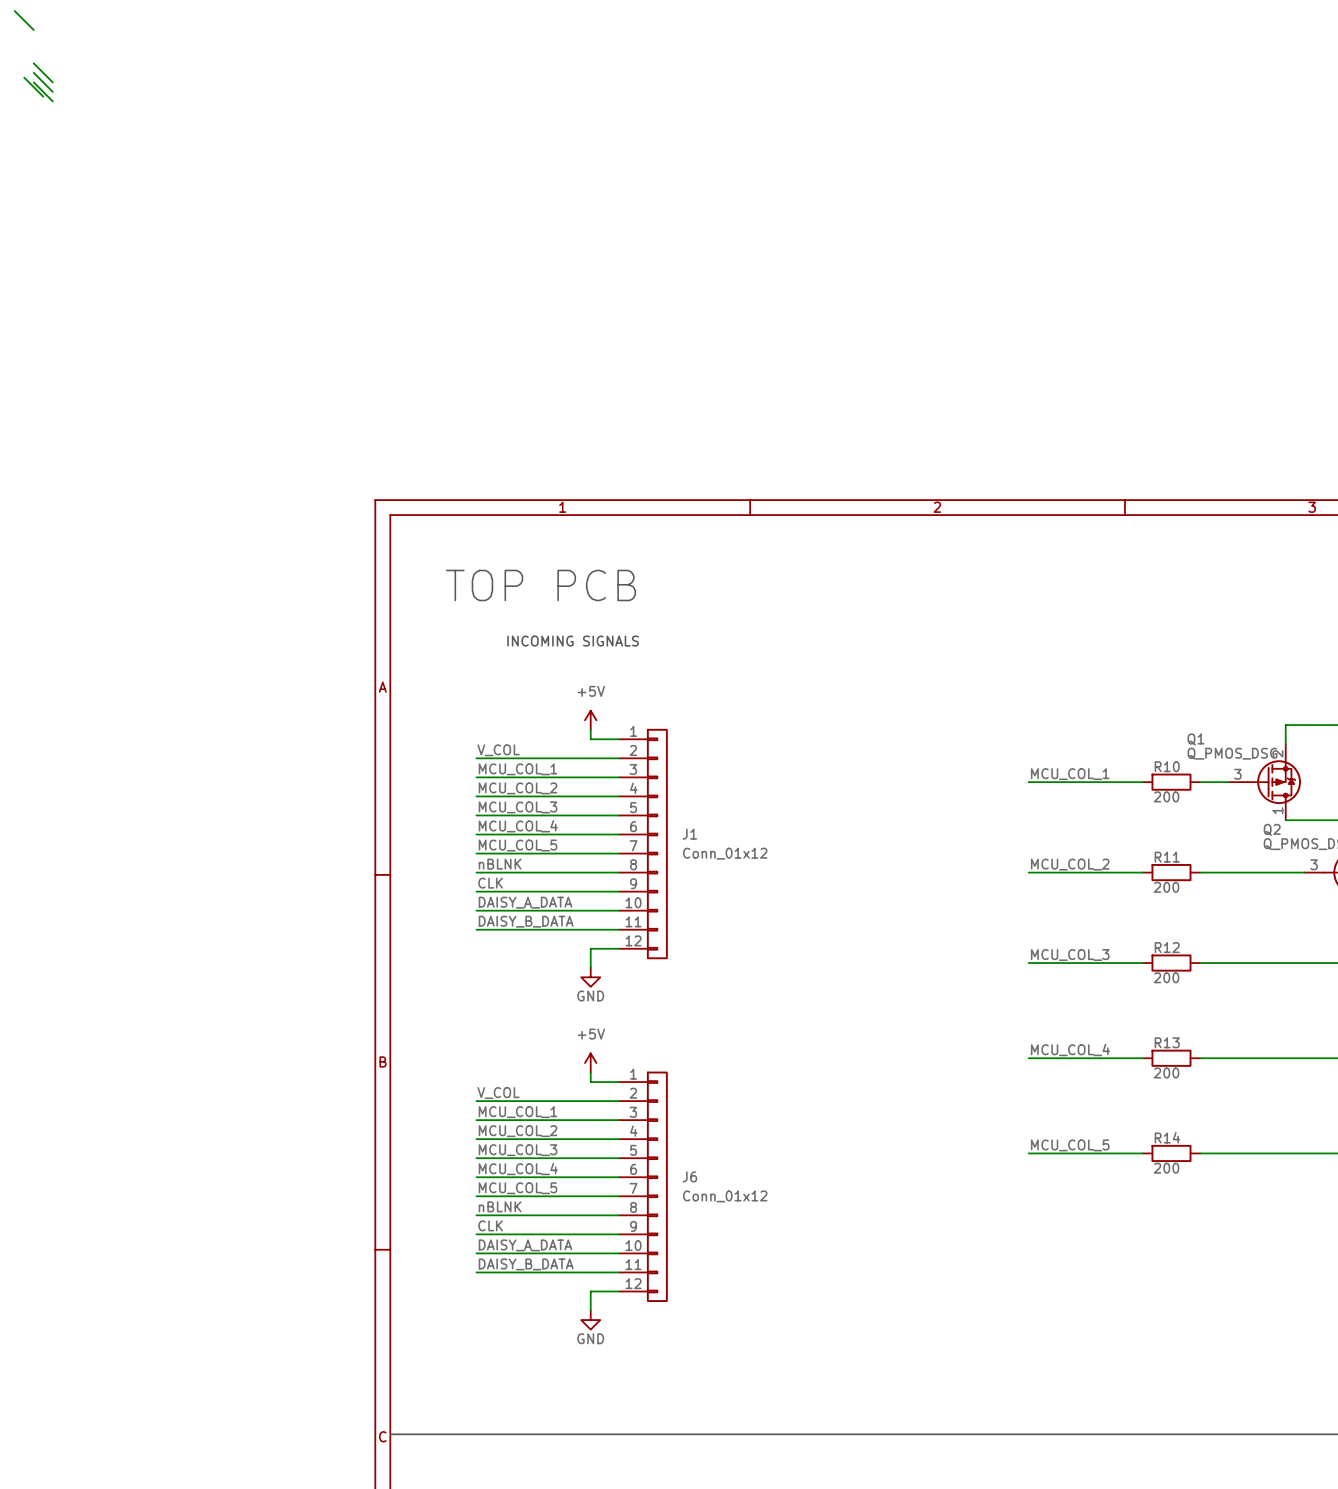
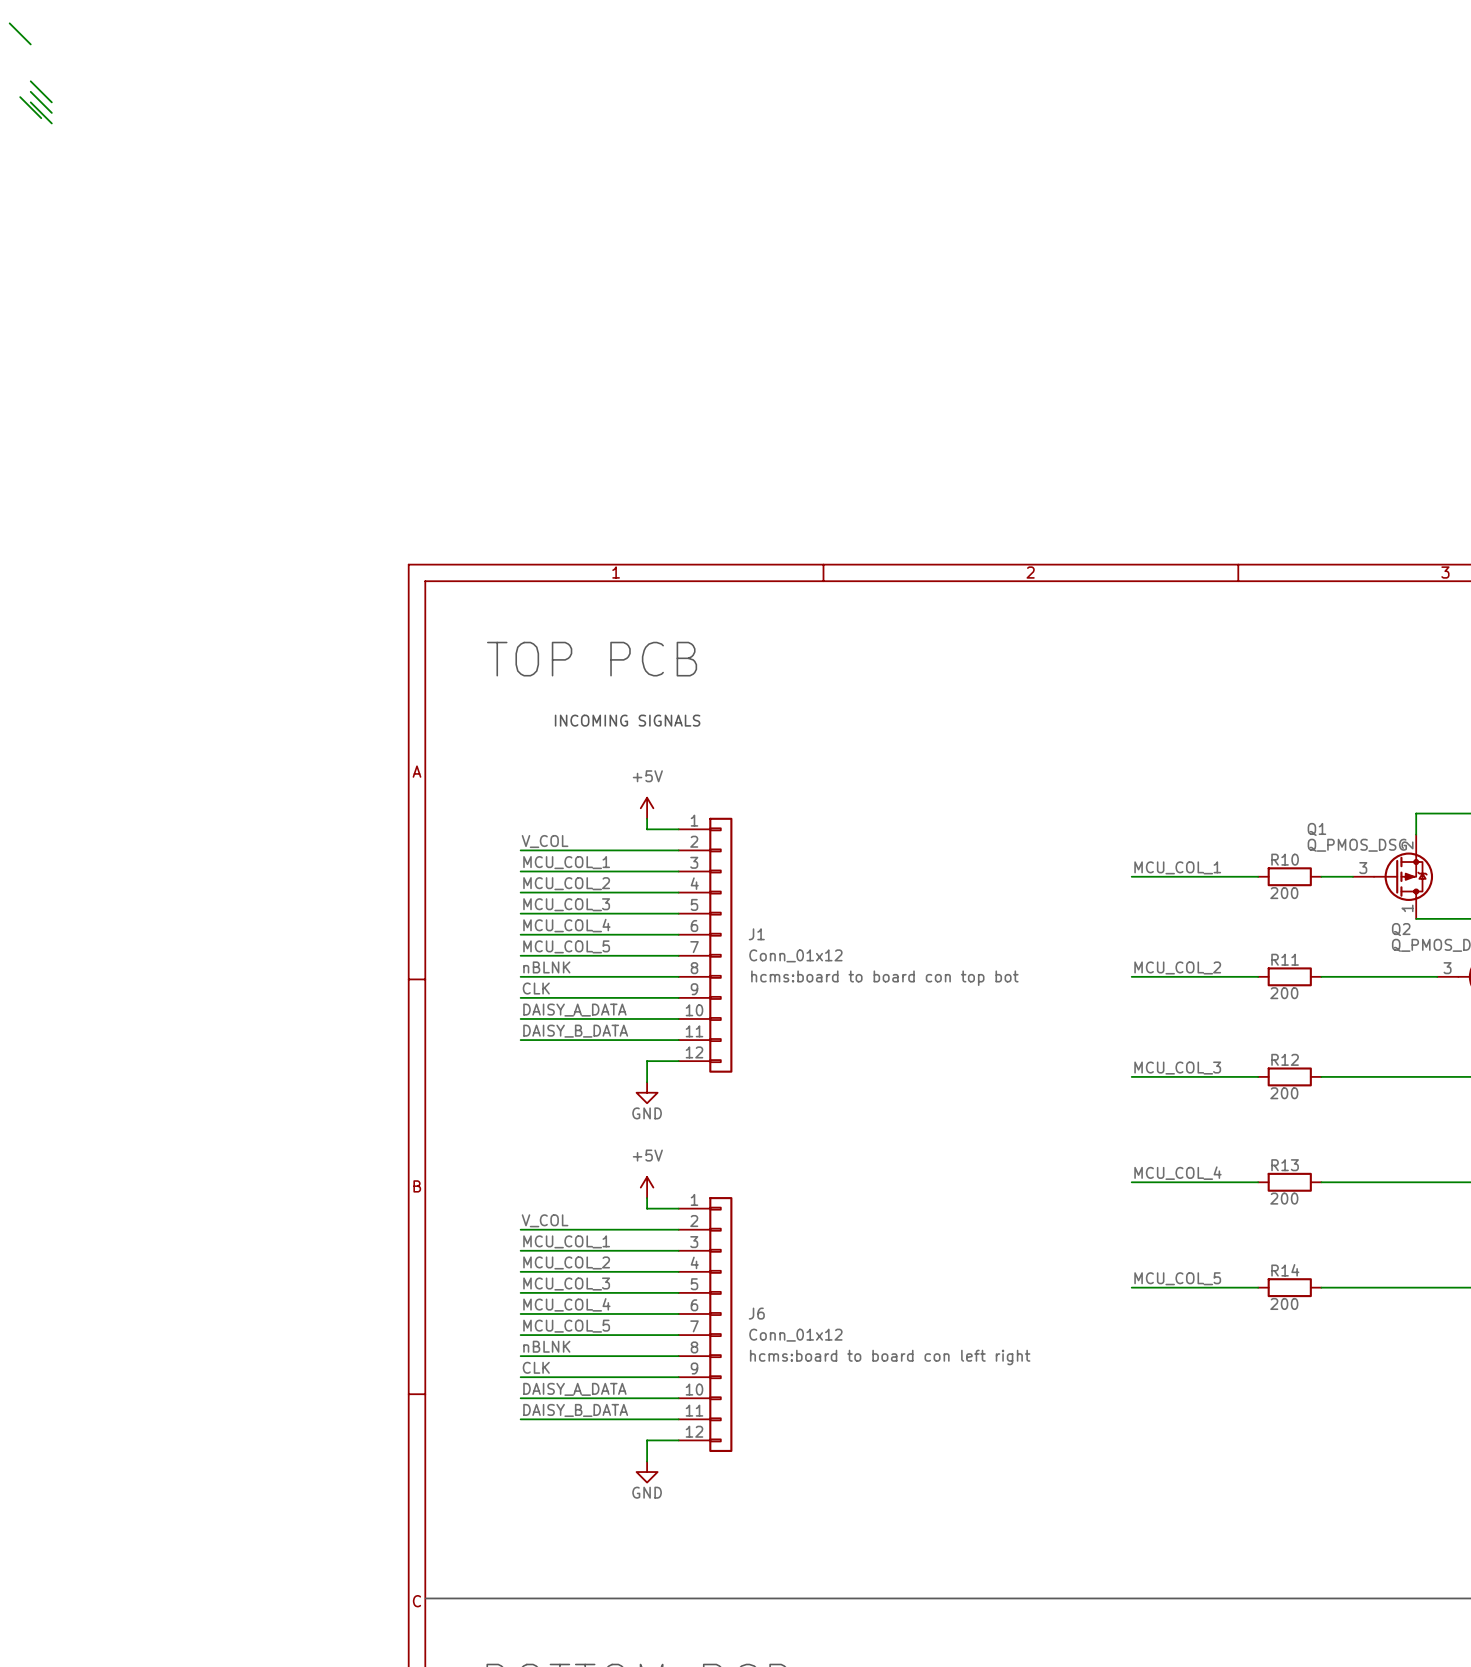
J1 text: none -> hcms:board to board con top bot (884, 978)
J6 text: none -> hcms:board to board con left right (890, 1357)

